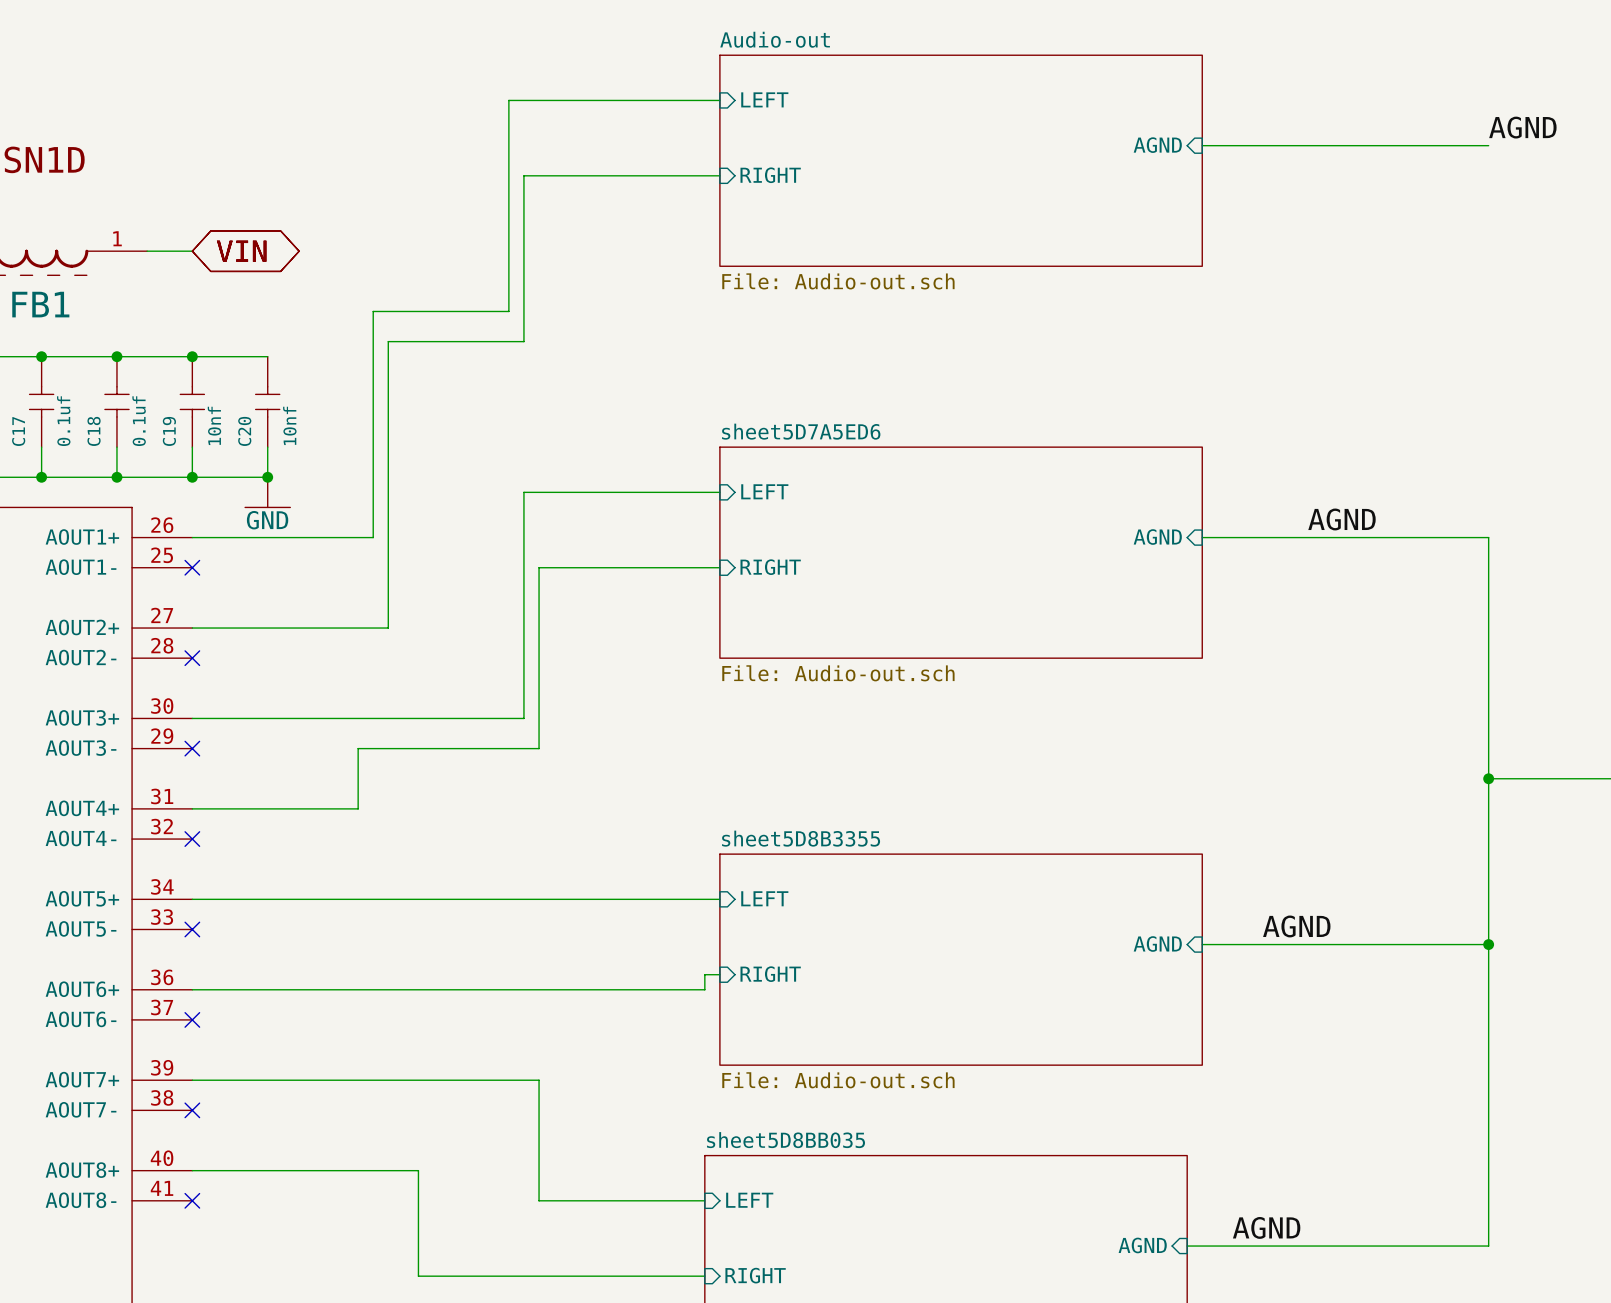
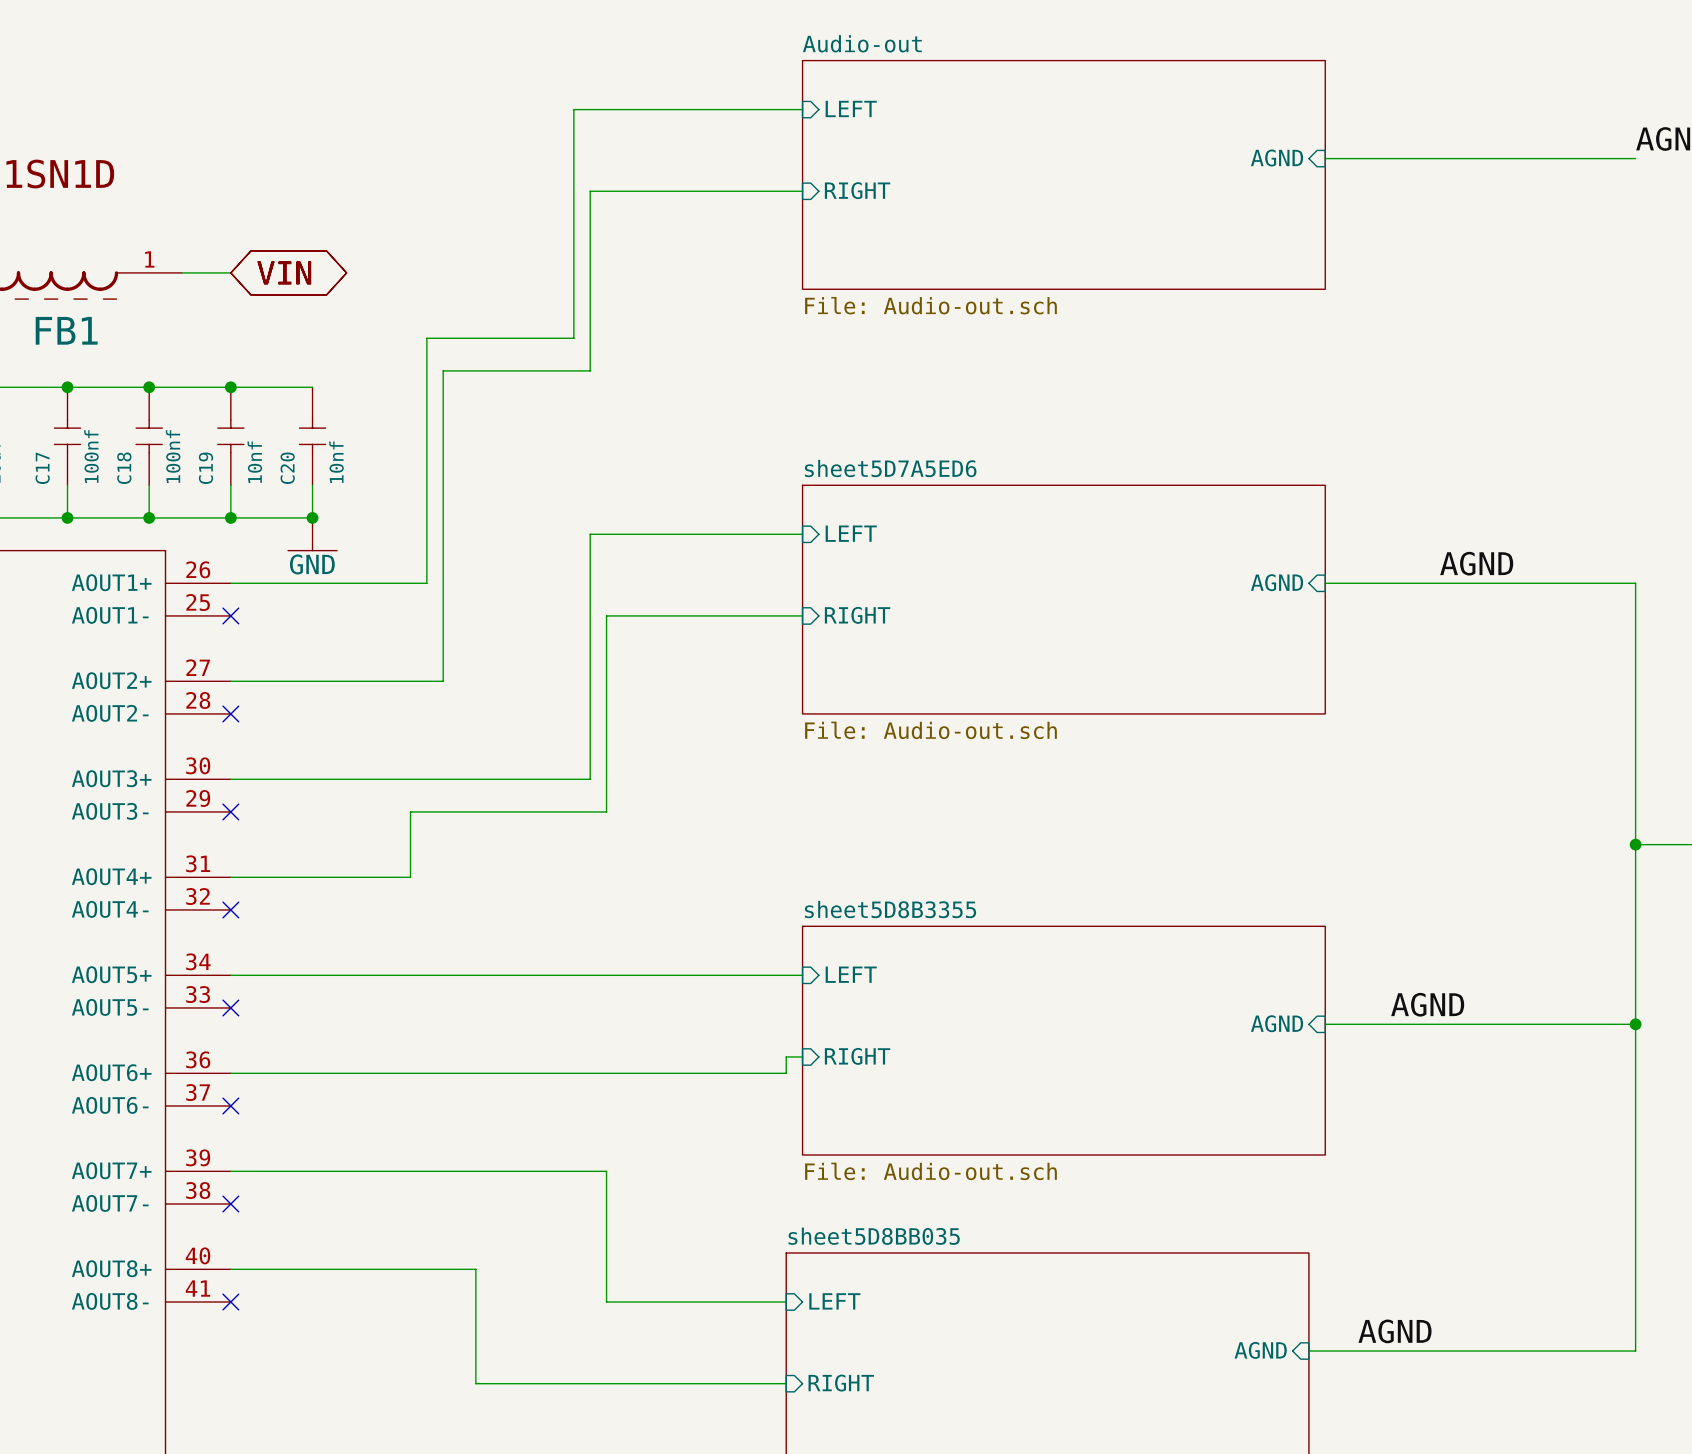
C17 value: 0.1uf (63, 421) -> 100nf (91, 456)
C18 value: 0.1uf (139, 421) -> 100nf (173, 456)

